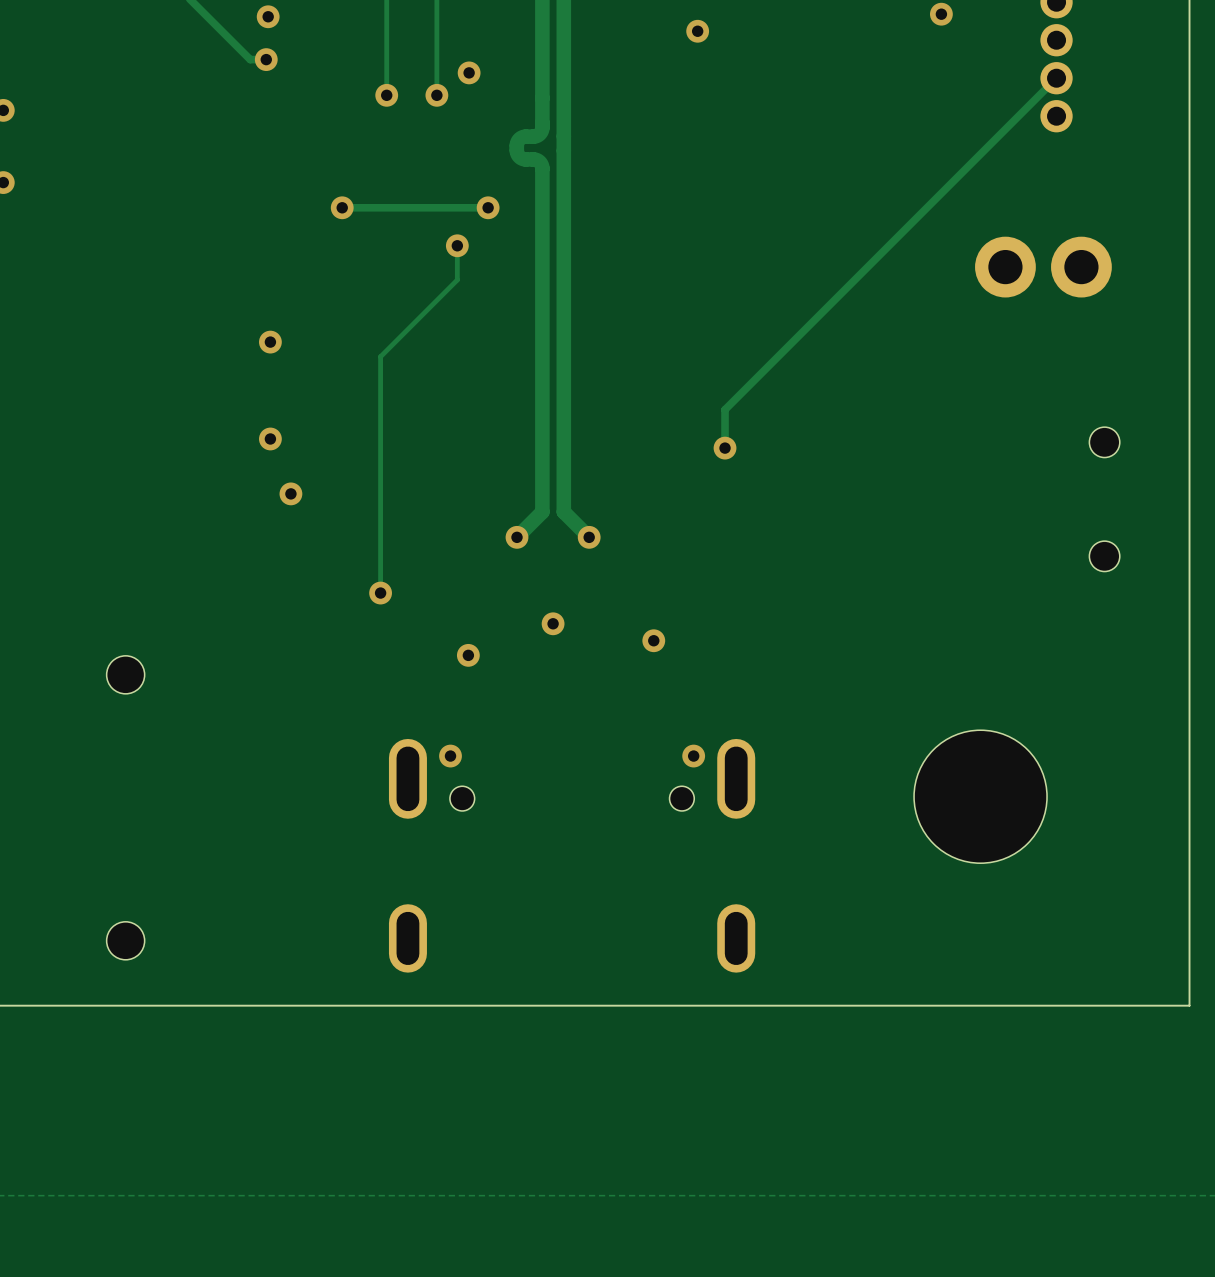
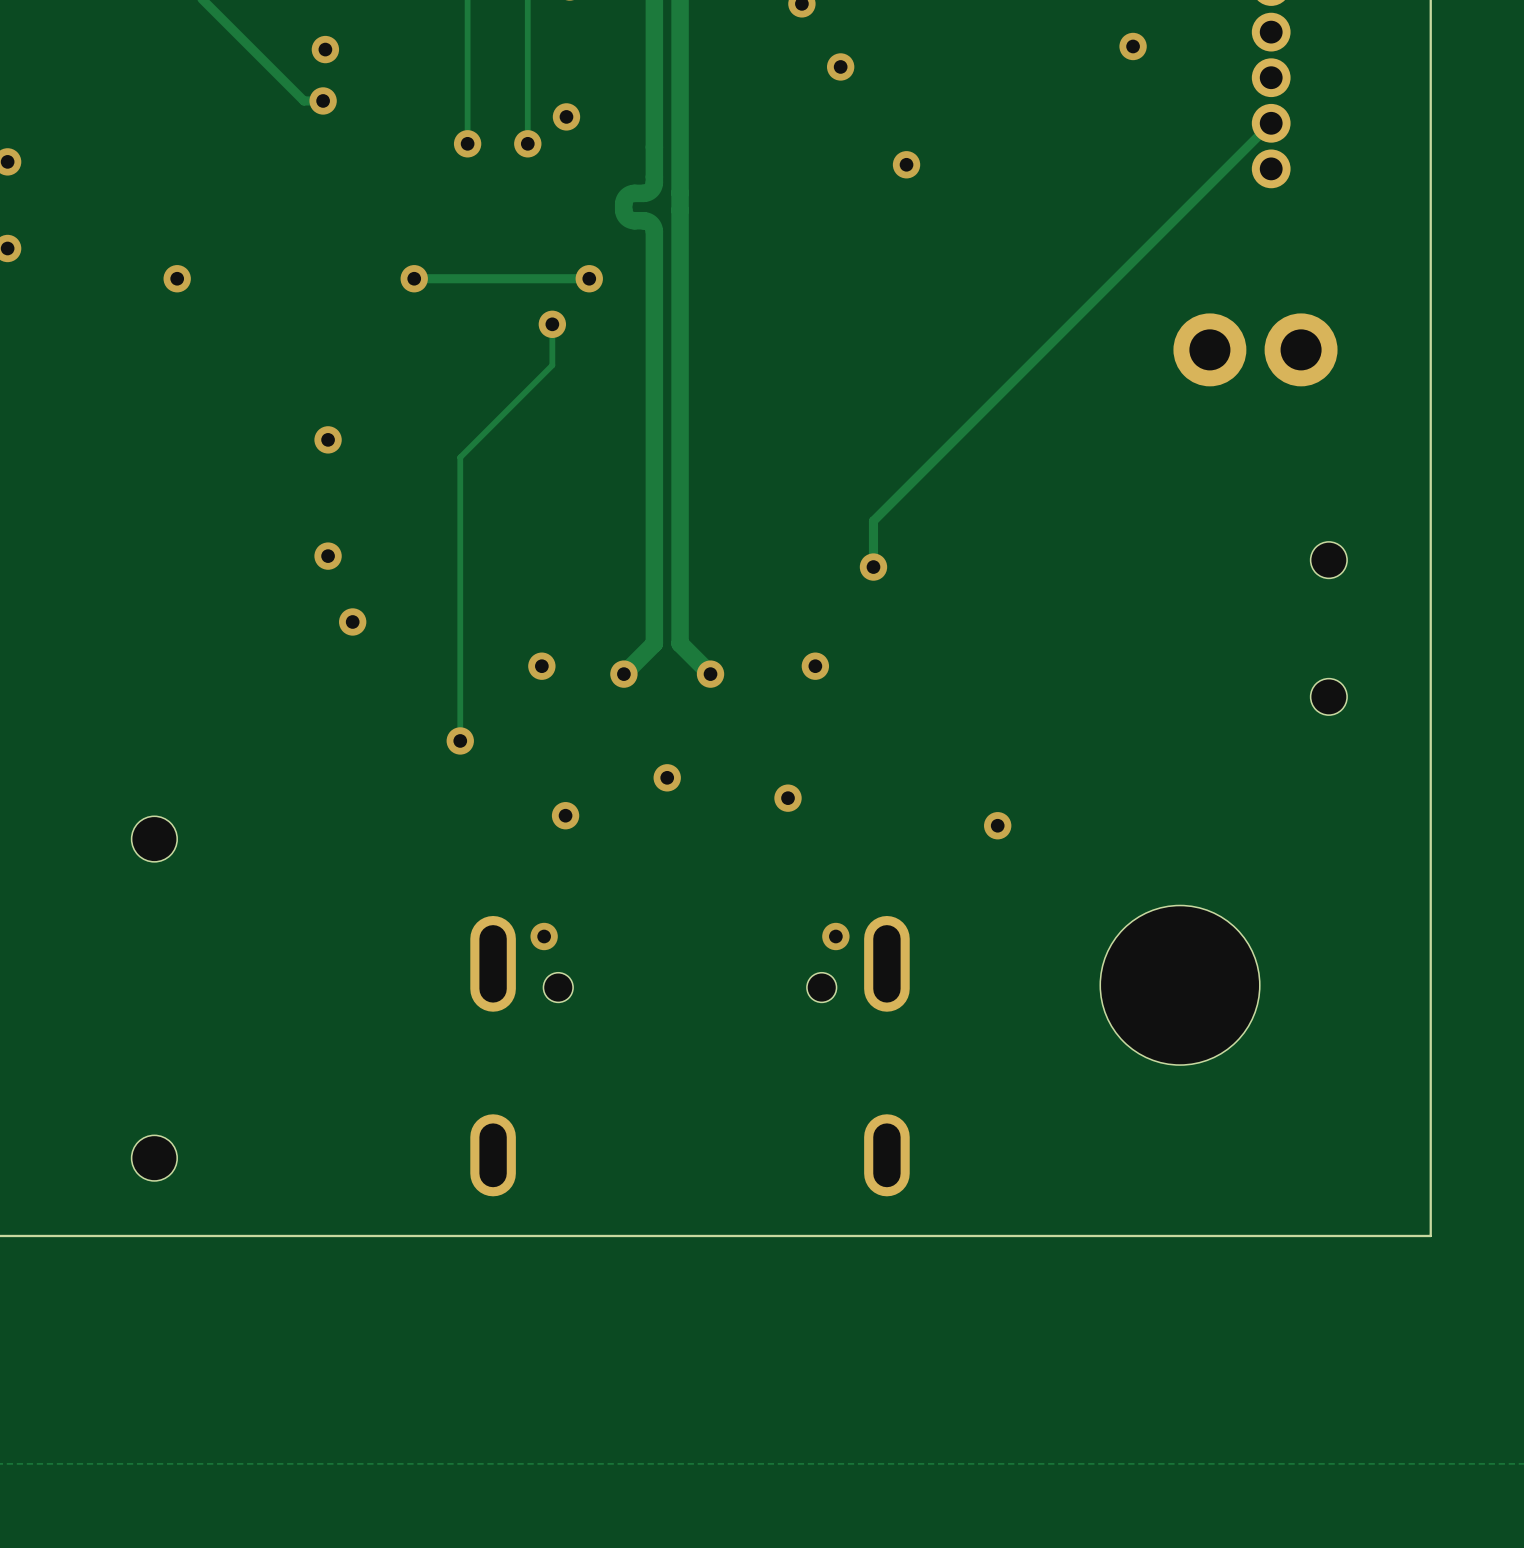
via: none -> (906, 164)
via: none -> (177, 278)
via: none -> (541, 666)
via: none -> (815, 666)
via: none -> (997, 825)

